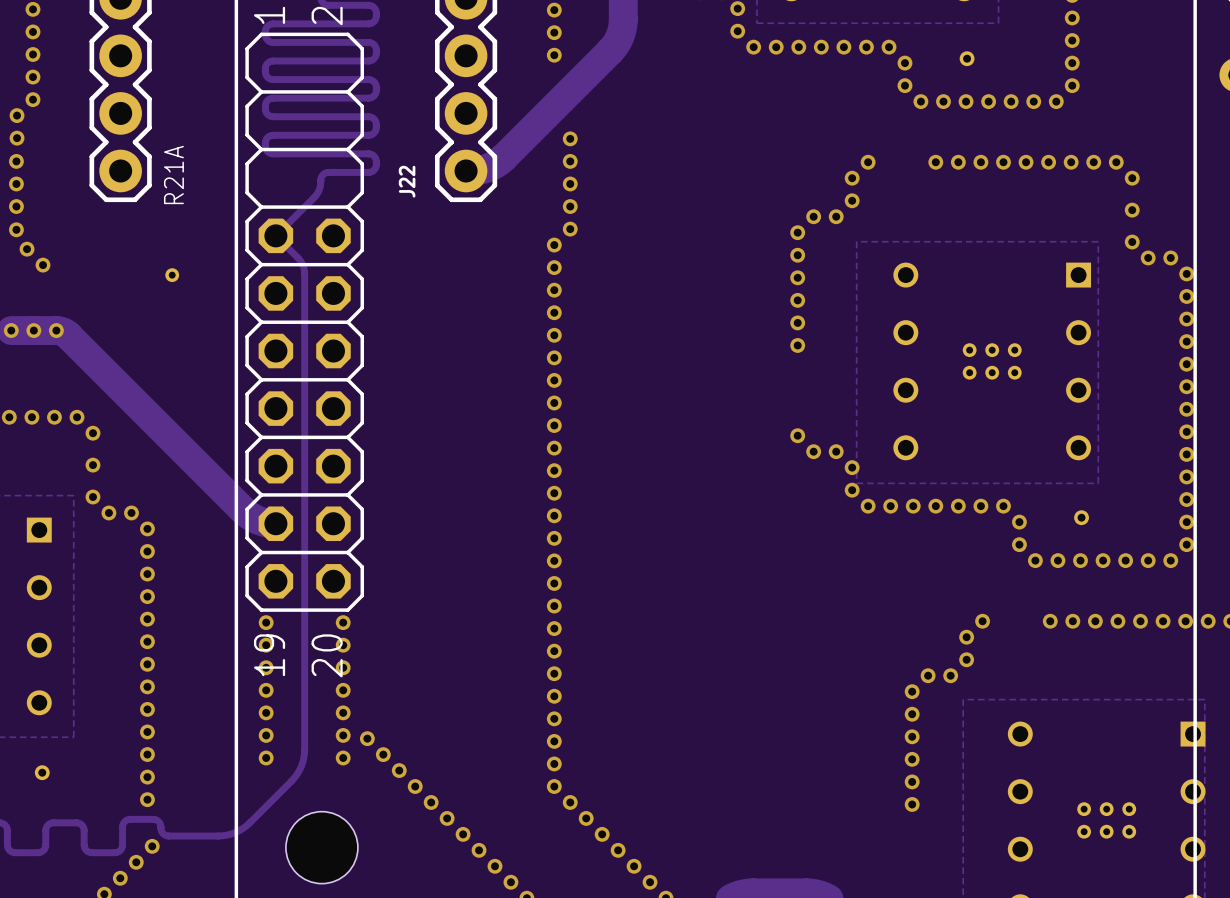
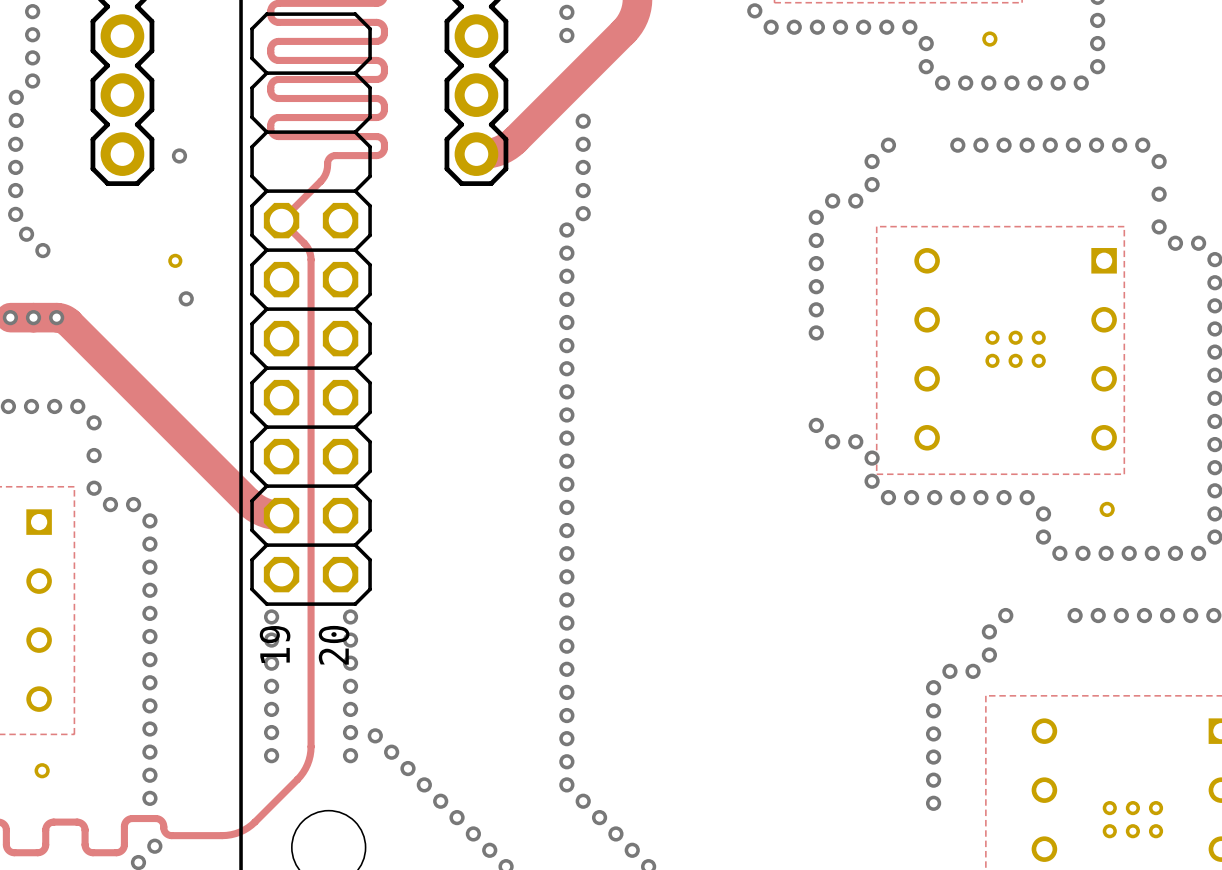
via: none -> (179, 155)
R21A name: R21A (173, 174) -> none
J22 name: J22 (407, 181) -> none
via: none -> (186, 298)

